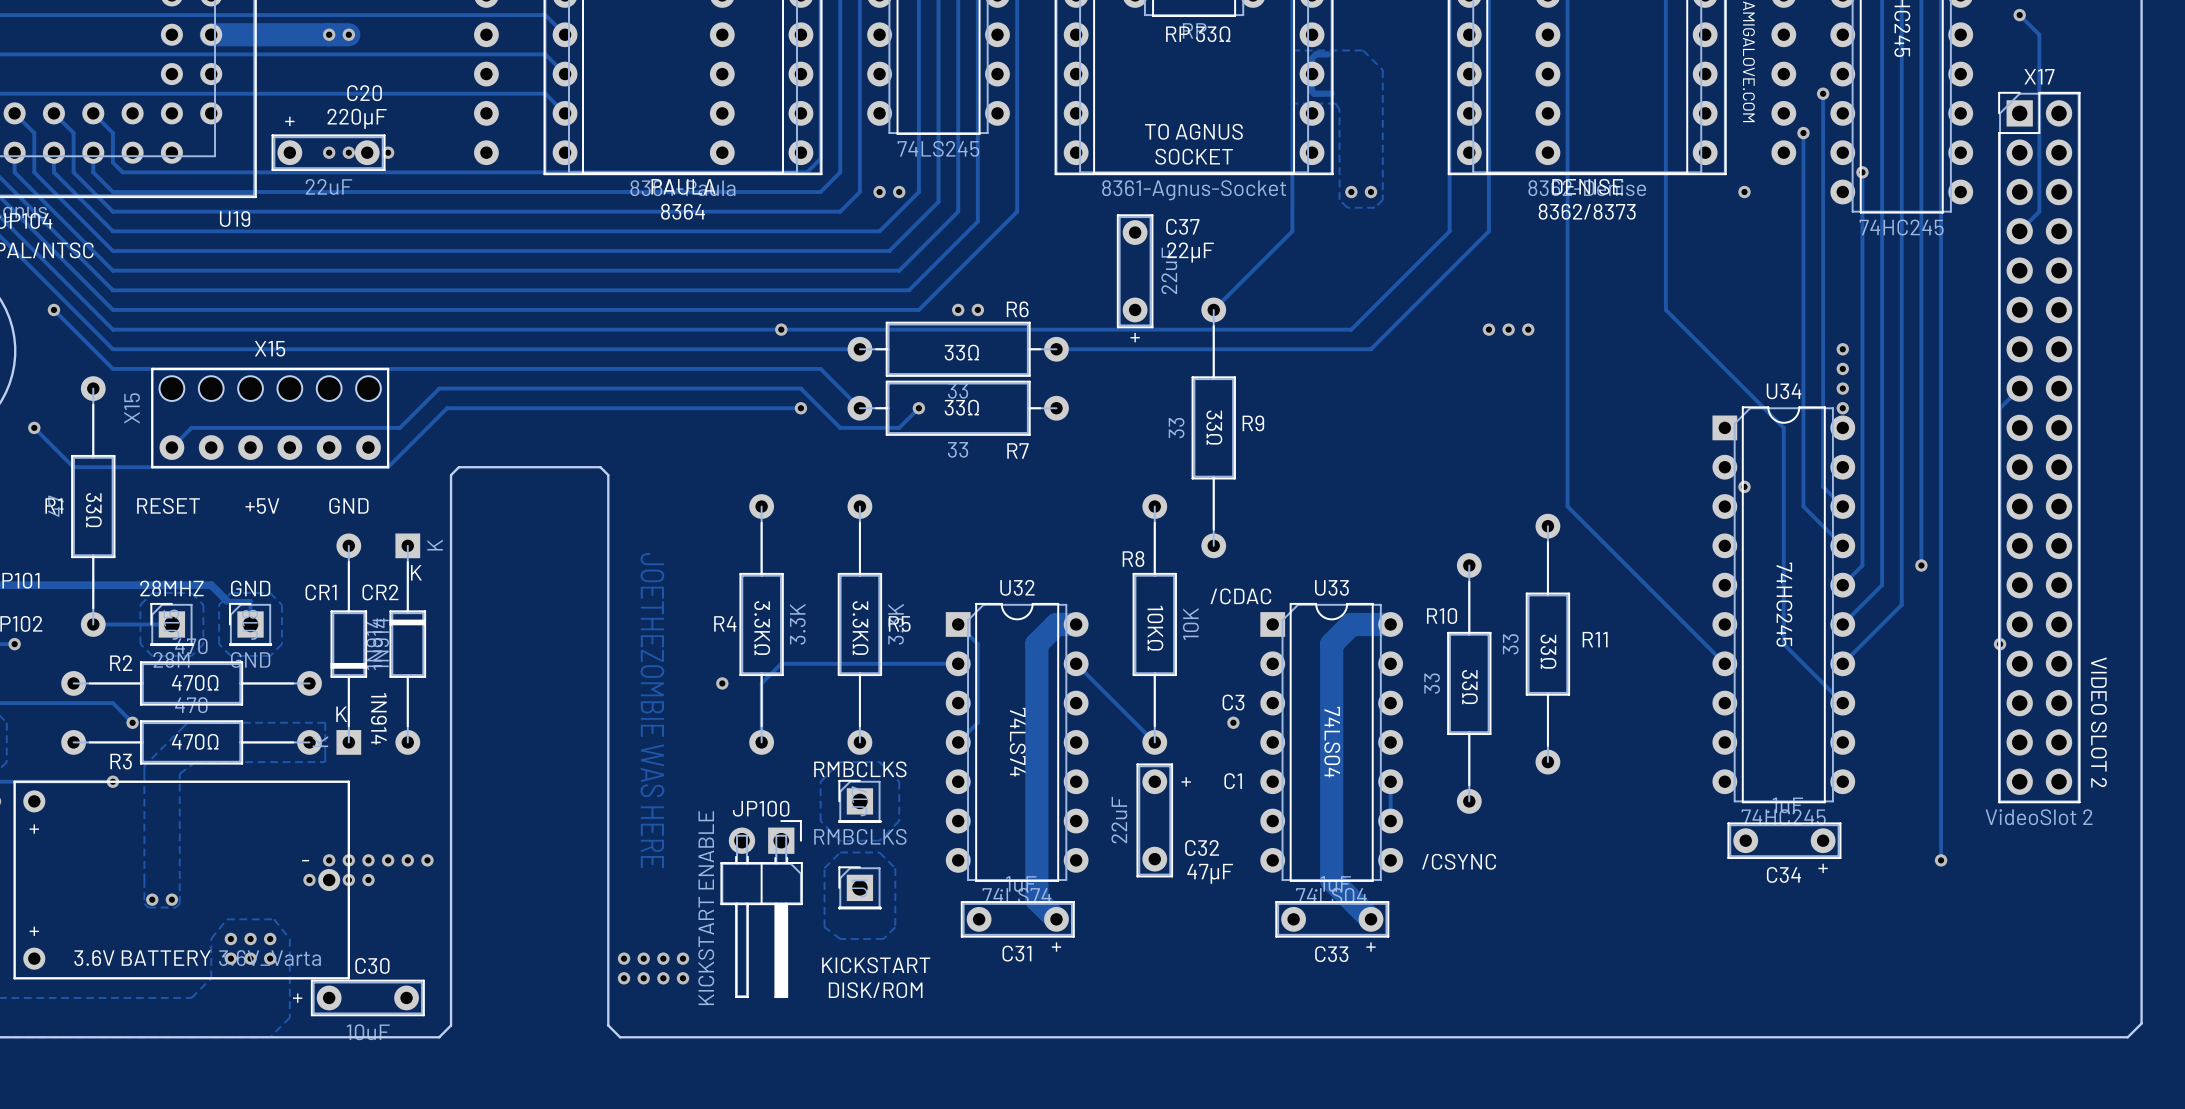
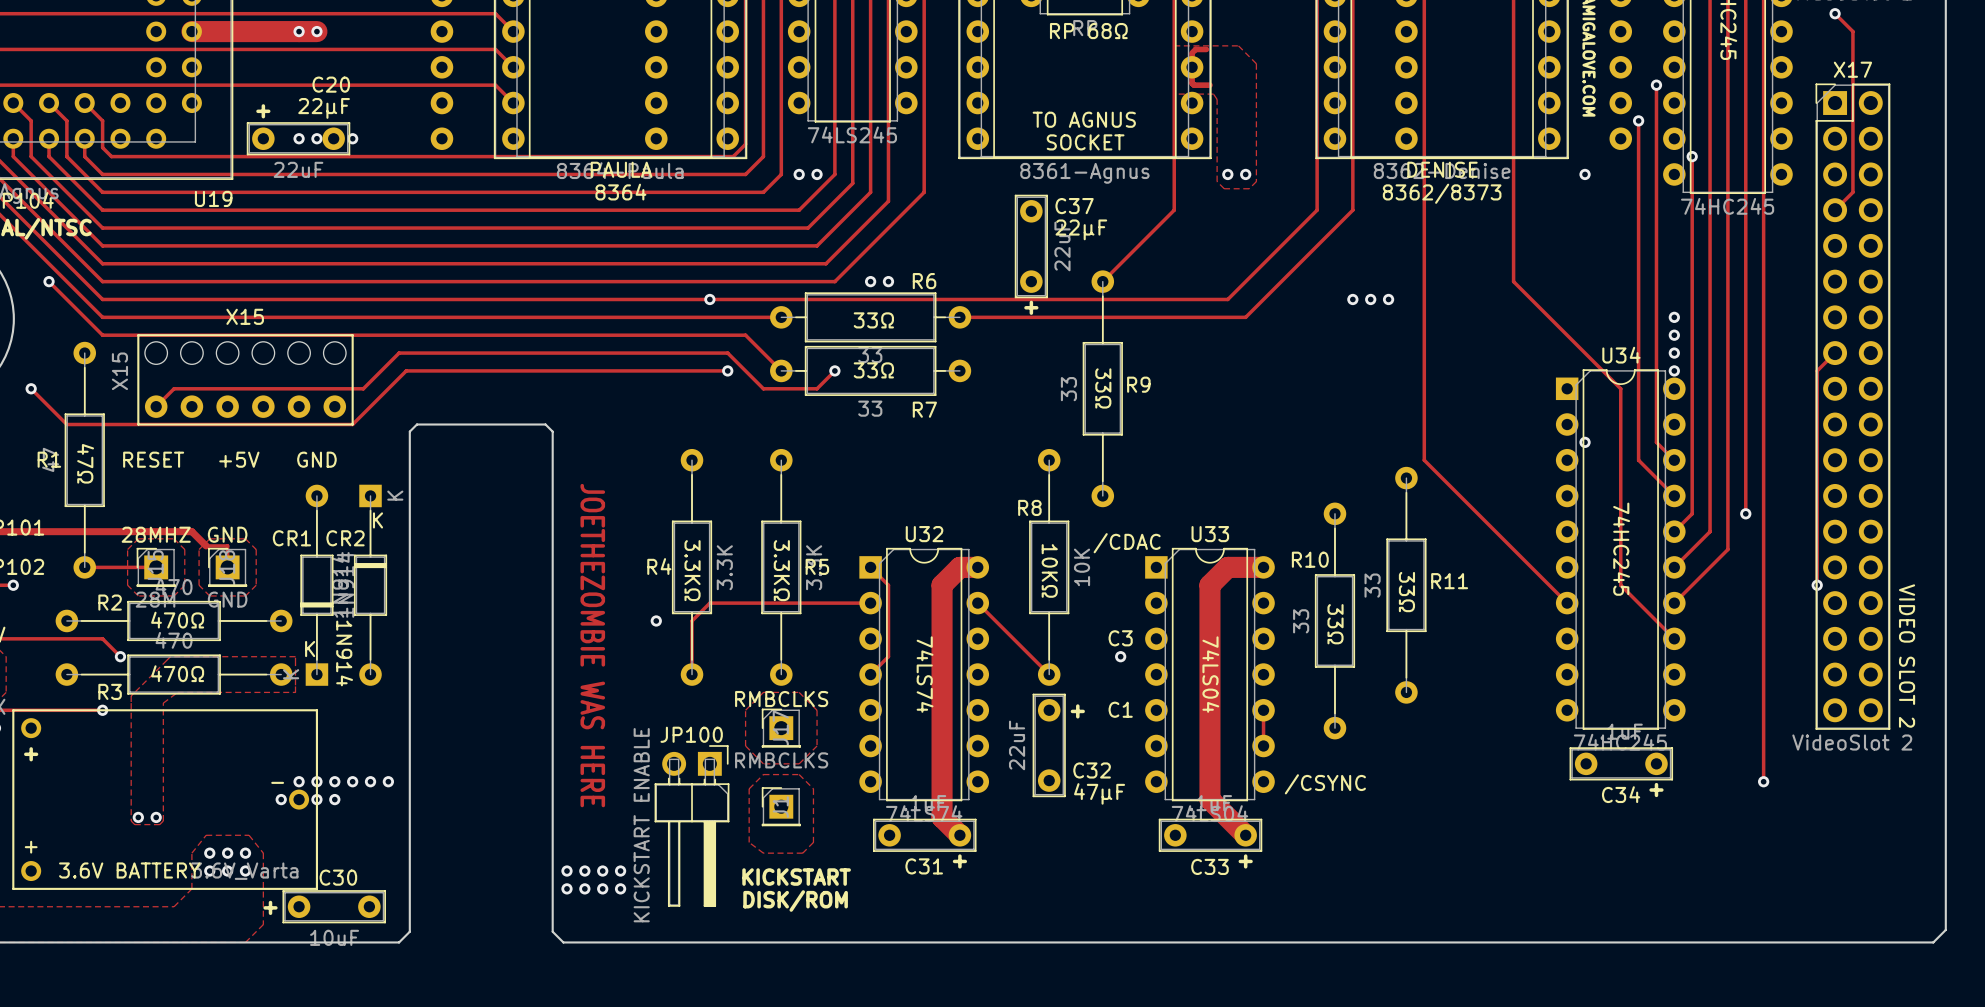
text: RP 33Ω (1198, 34) -> RP 68Ω (1088, 31)
text: 220µF (357, 118) -> 22µF (324, 108)
part value: 8361-Agnus-Socket (1194, 190) -> 8361-Agnus (1084, 173)
text: 33Ω (93, 510) -> 47Ω (85, 463)

